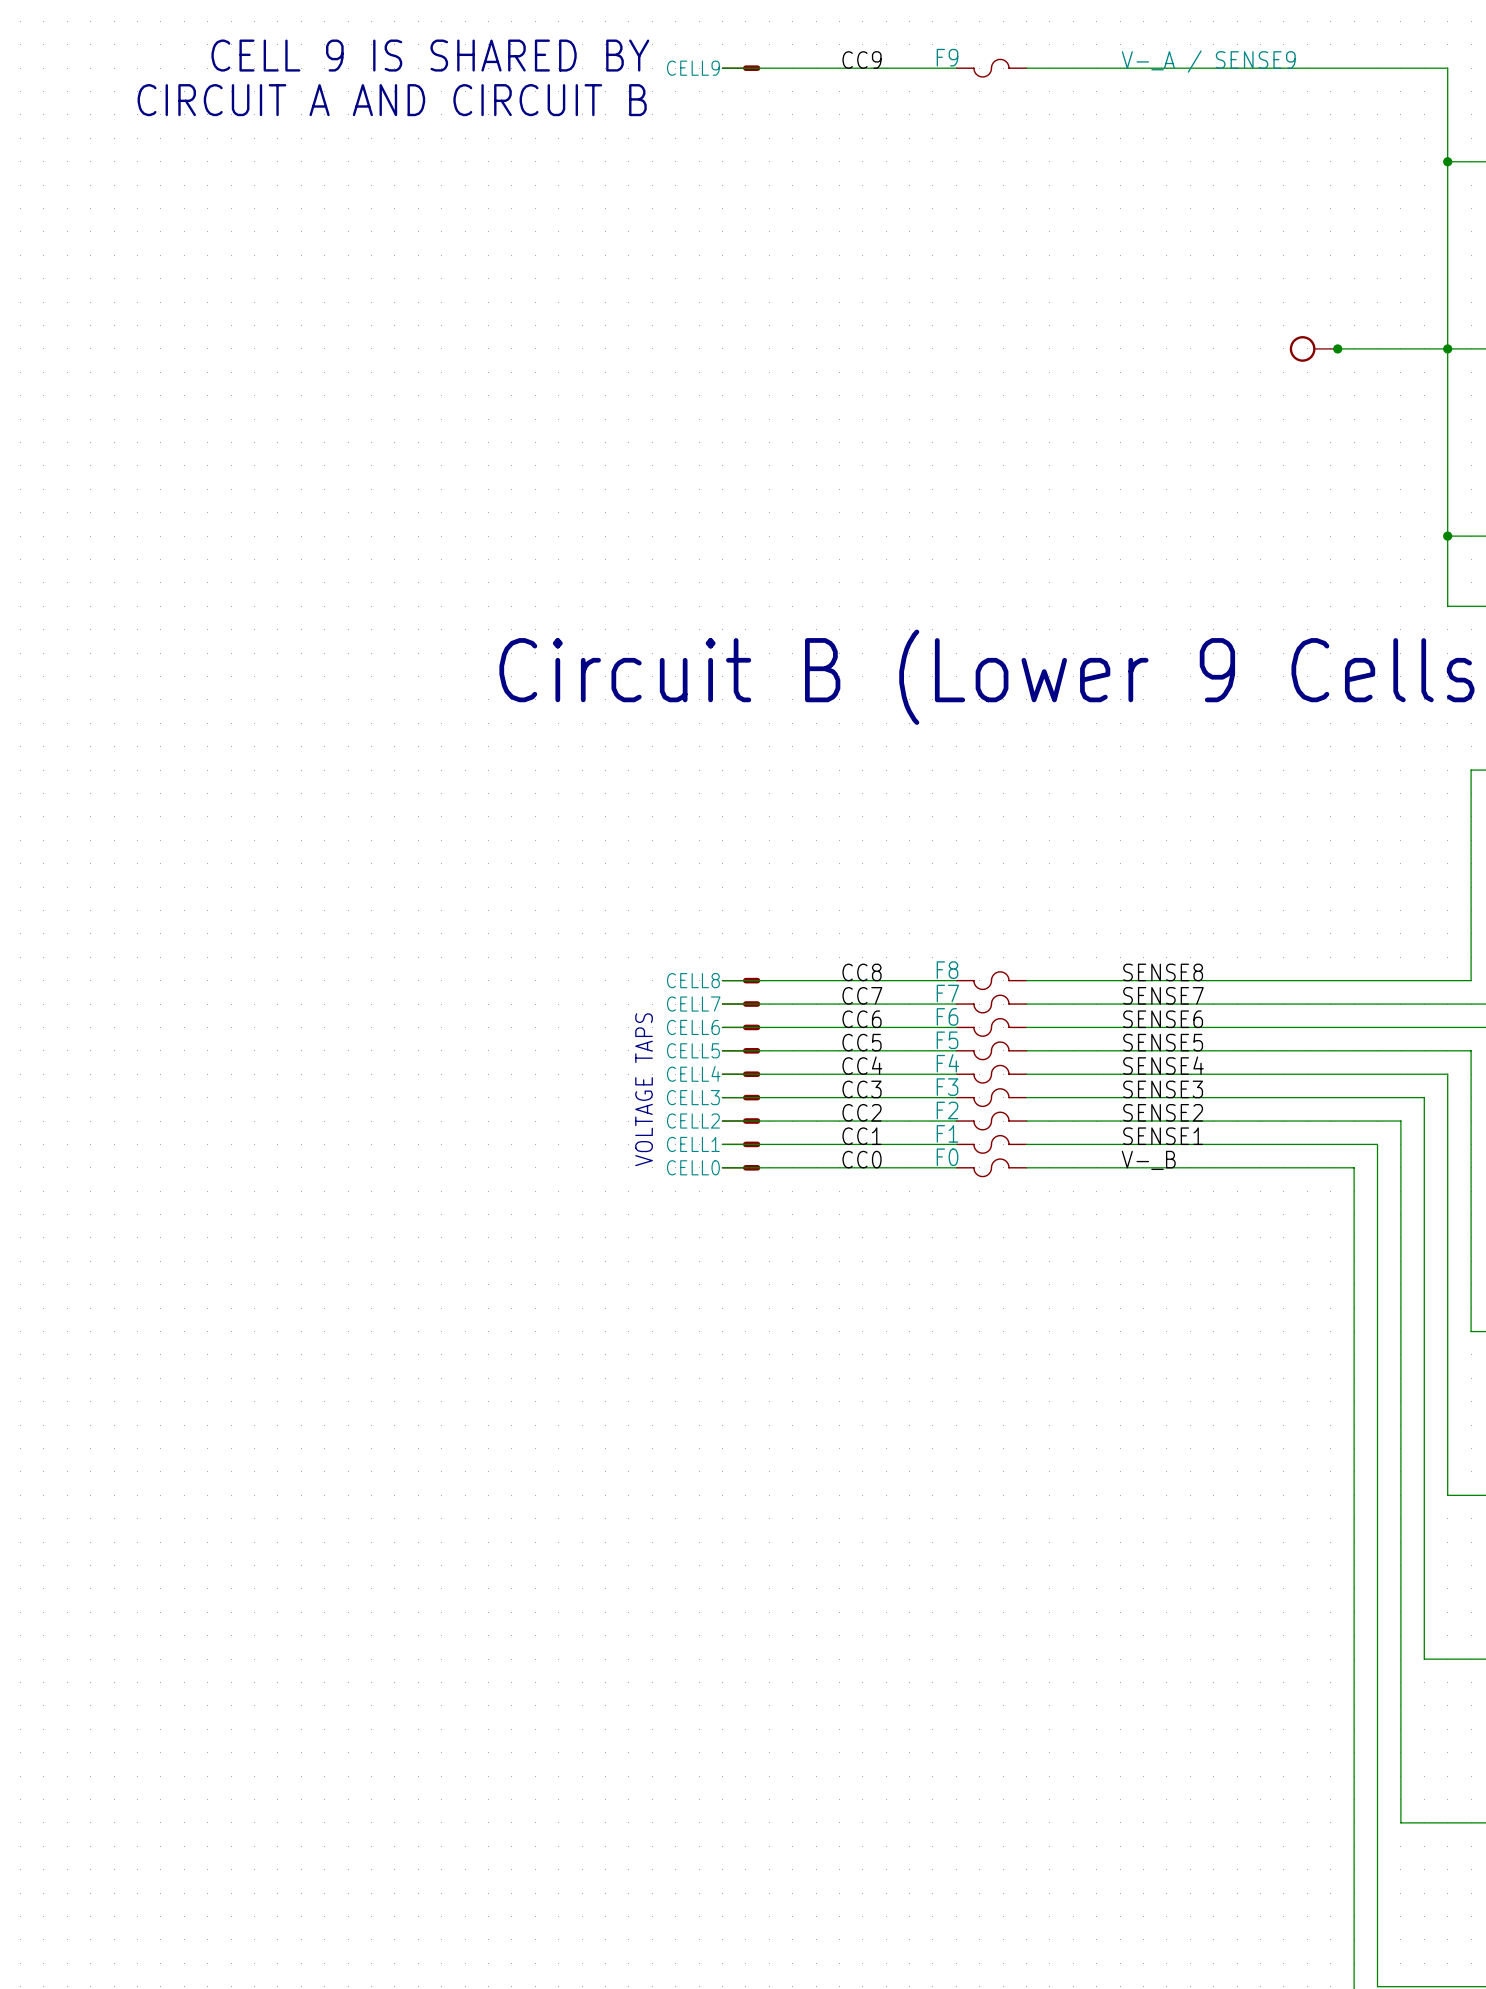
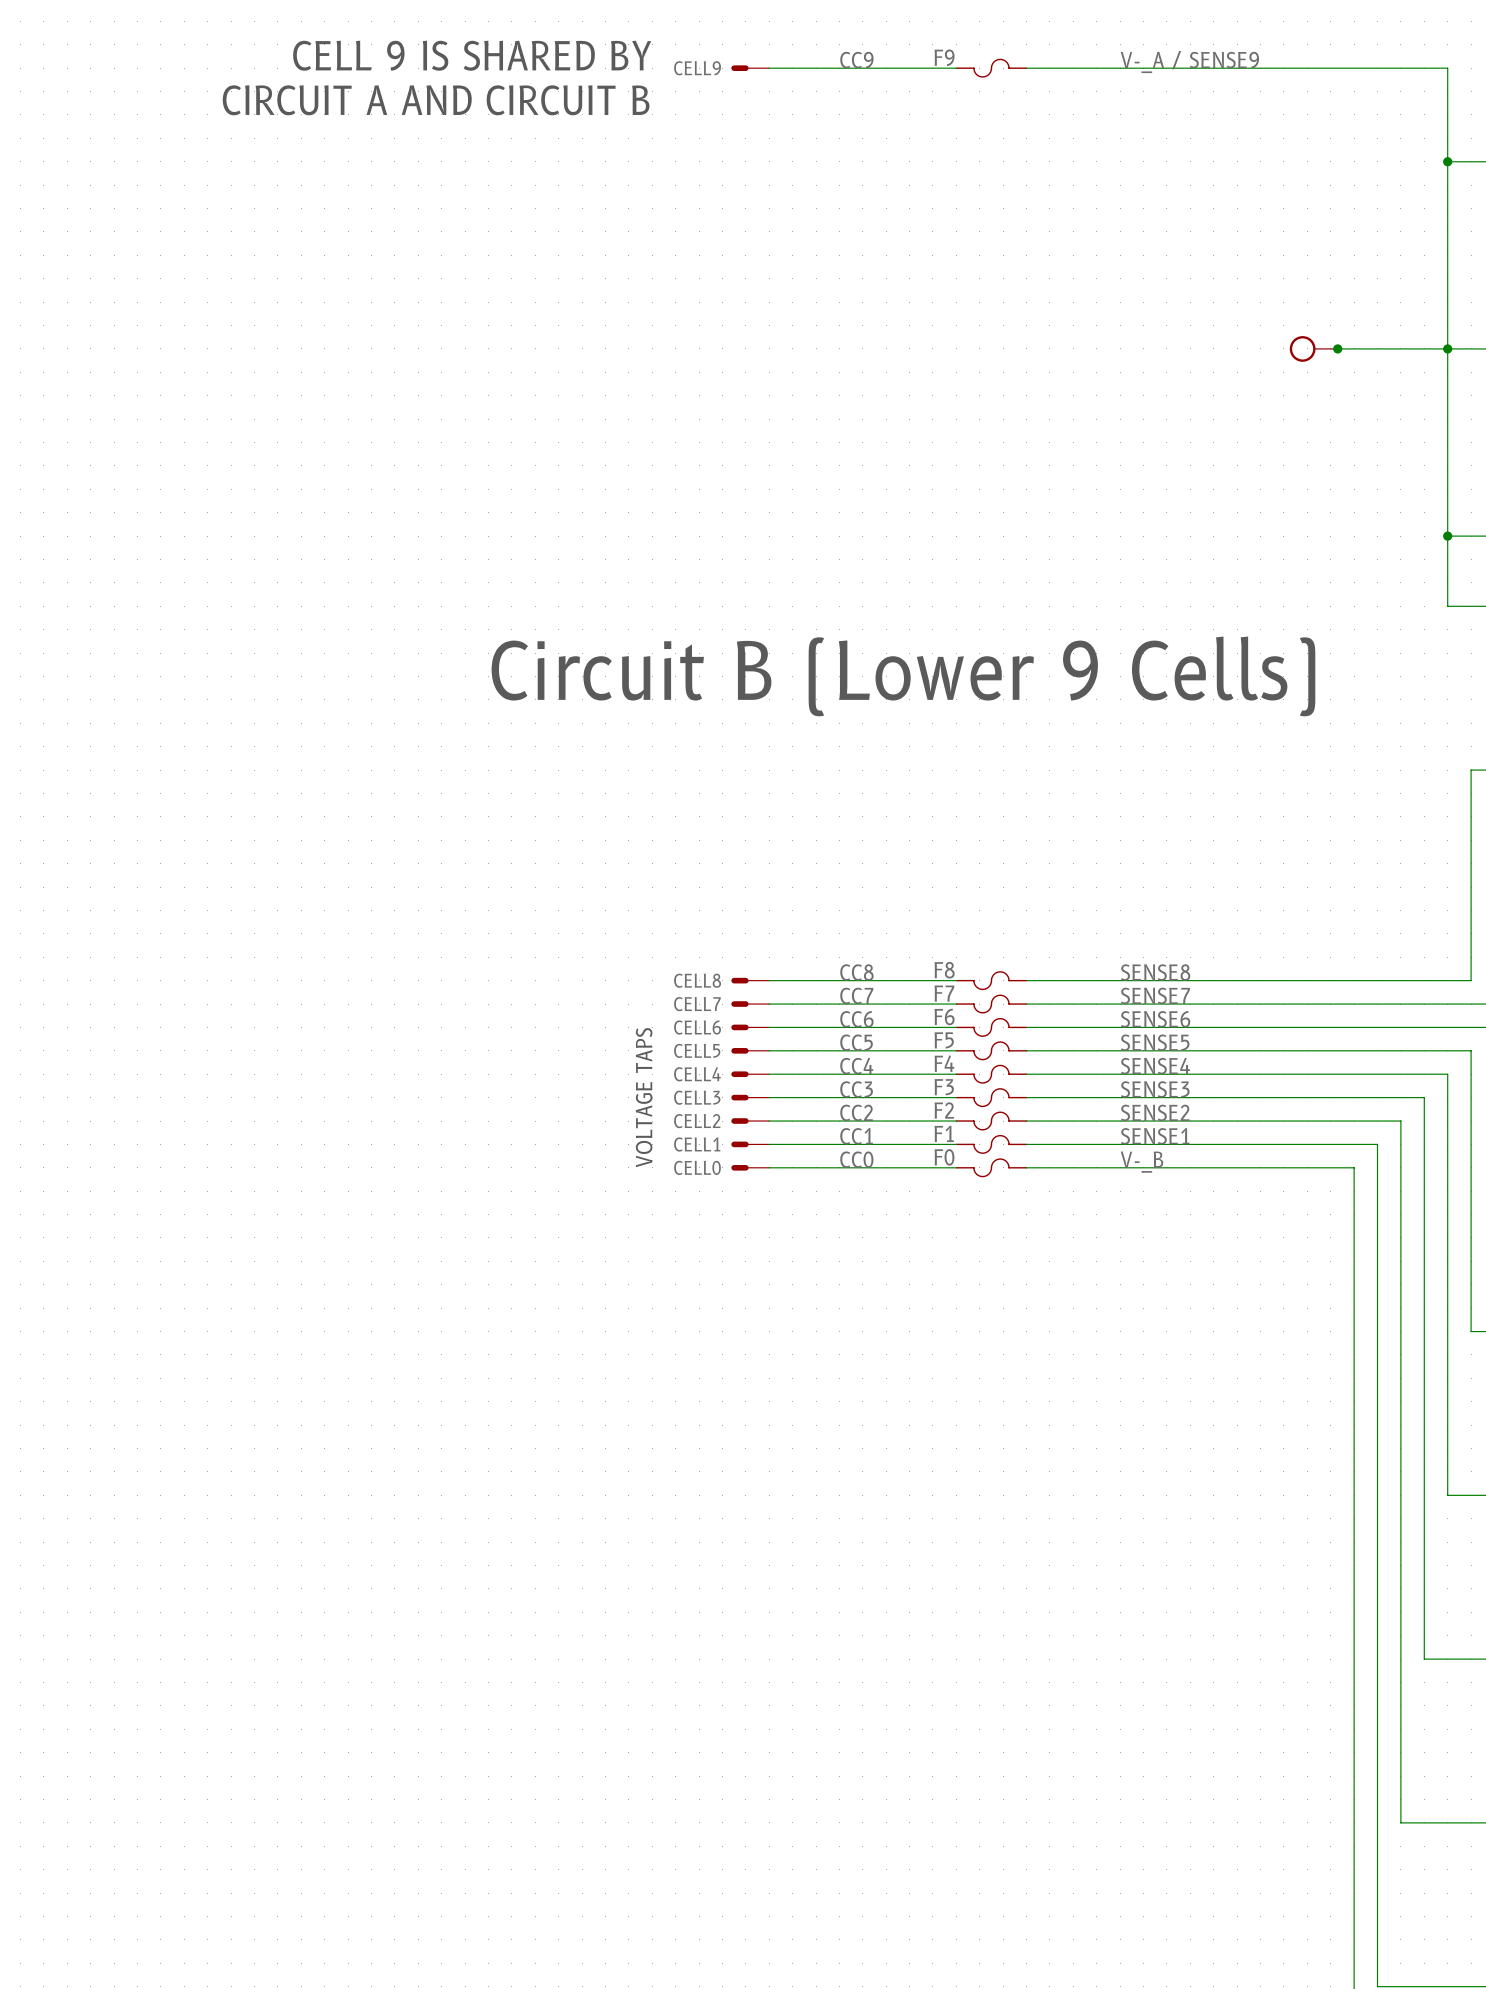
CELL9 rotation: 0° (751, 68) -> 180° (739, 68)
CELL8 rotation: 0° (751, 980) -> 180° (739, 980)
CELL7 rotation: 0° (751, 1004) -> 180° (739, 1004)
CELL6 rotation: 0° (751, 1027) -> 180° (739, 1027)
CELL5 rotation: 0° (751, 1050) -> 180° (739, 1050)
CELL4 rotation: 0° (751, 1074) -> 180° (739, 1074)
CELL3 rotation: 0° (751, 1097) -> 180° (739, 1097)
CELL2 rotation: 0° (751, 1121) -> 180° (739, 1121)
CELL1 rotation: 0° (751, 1144) -> 180° (739, 1144)
CELL0 rotation: 0° (751, 1167) -> 180° (739, 1167)

